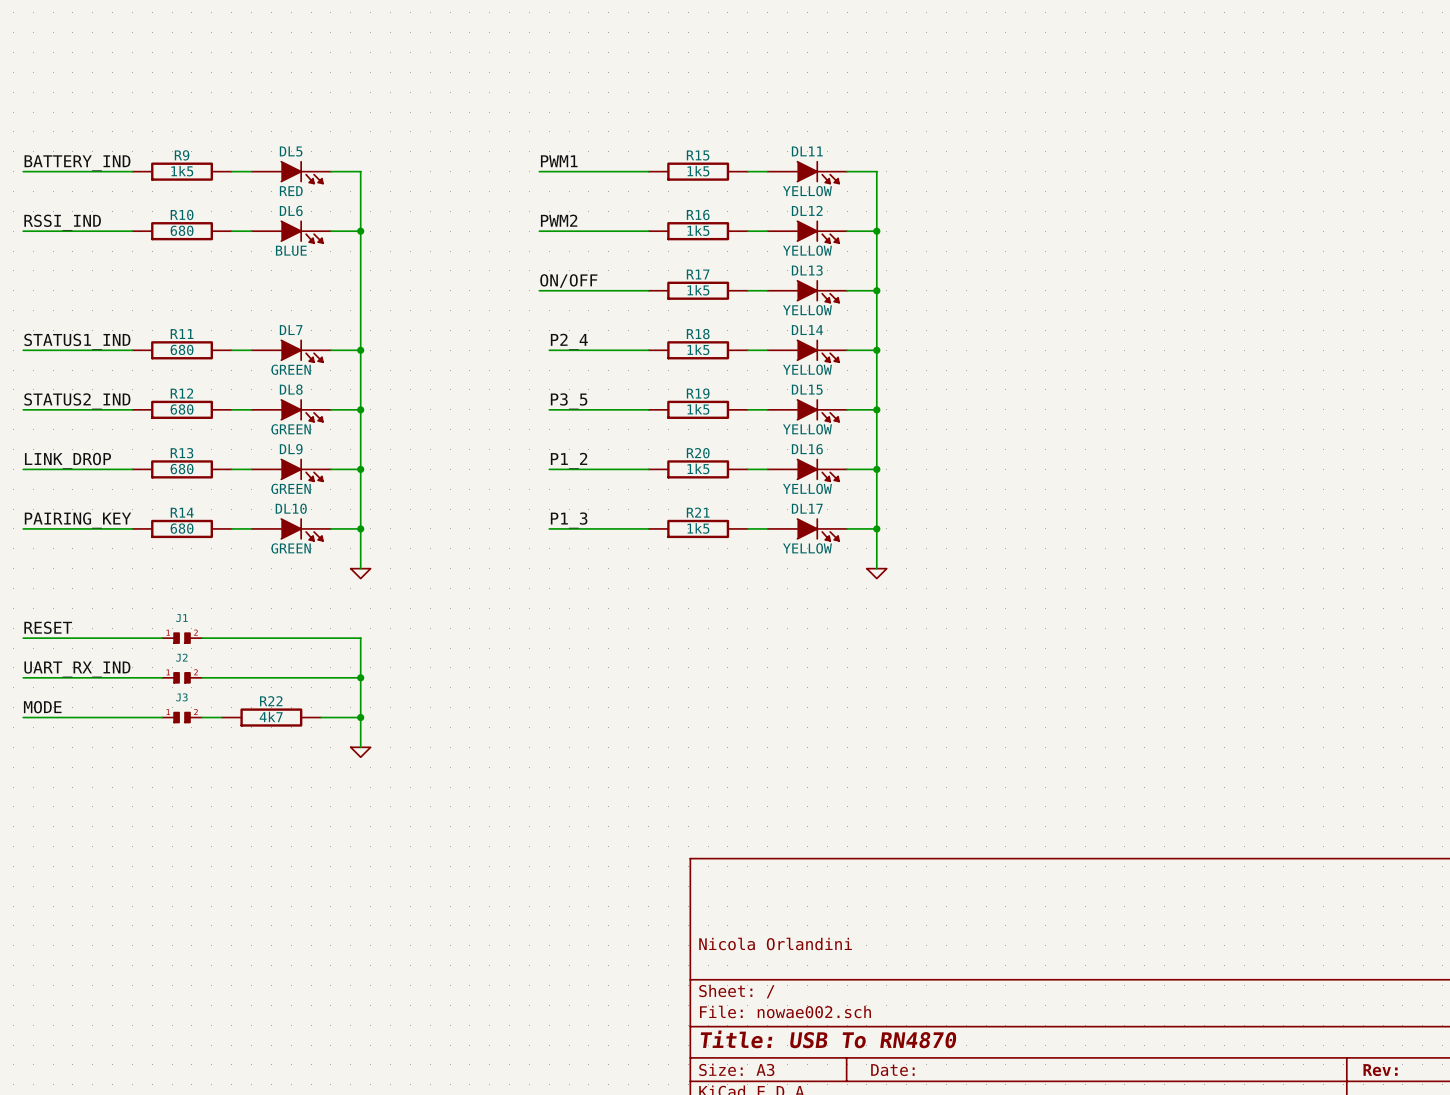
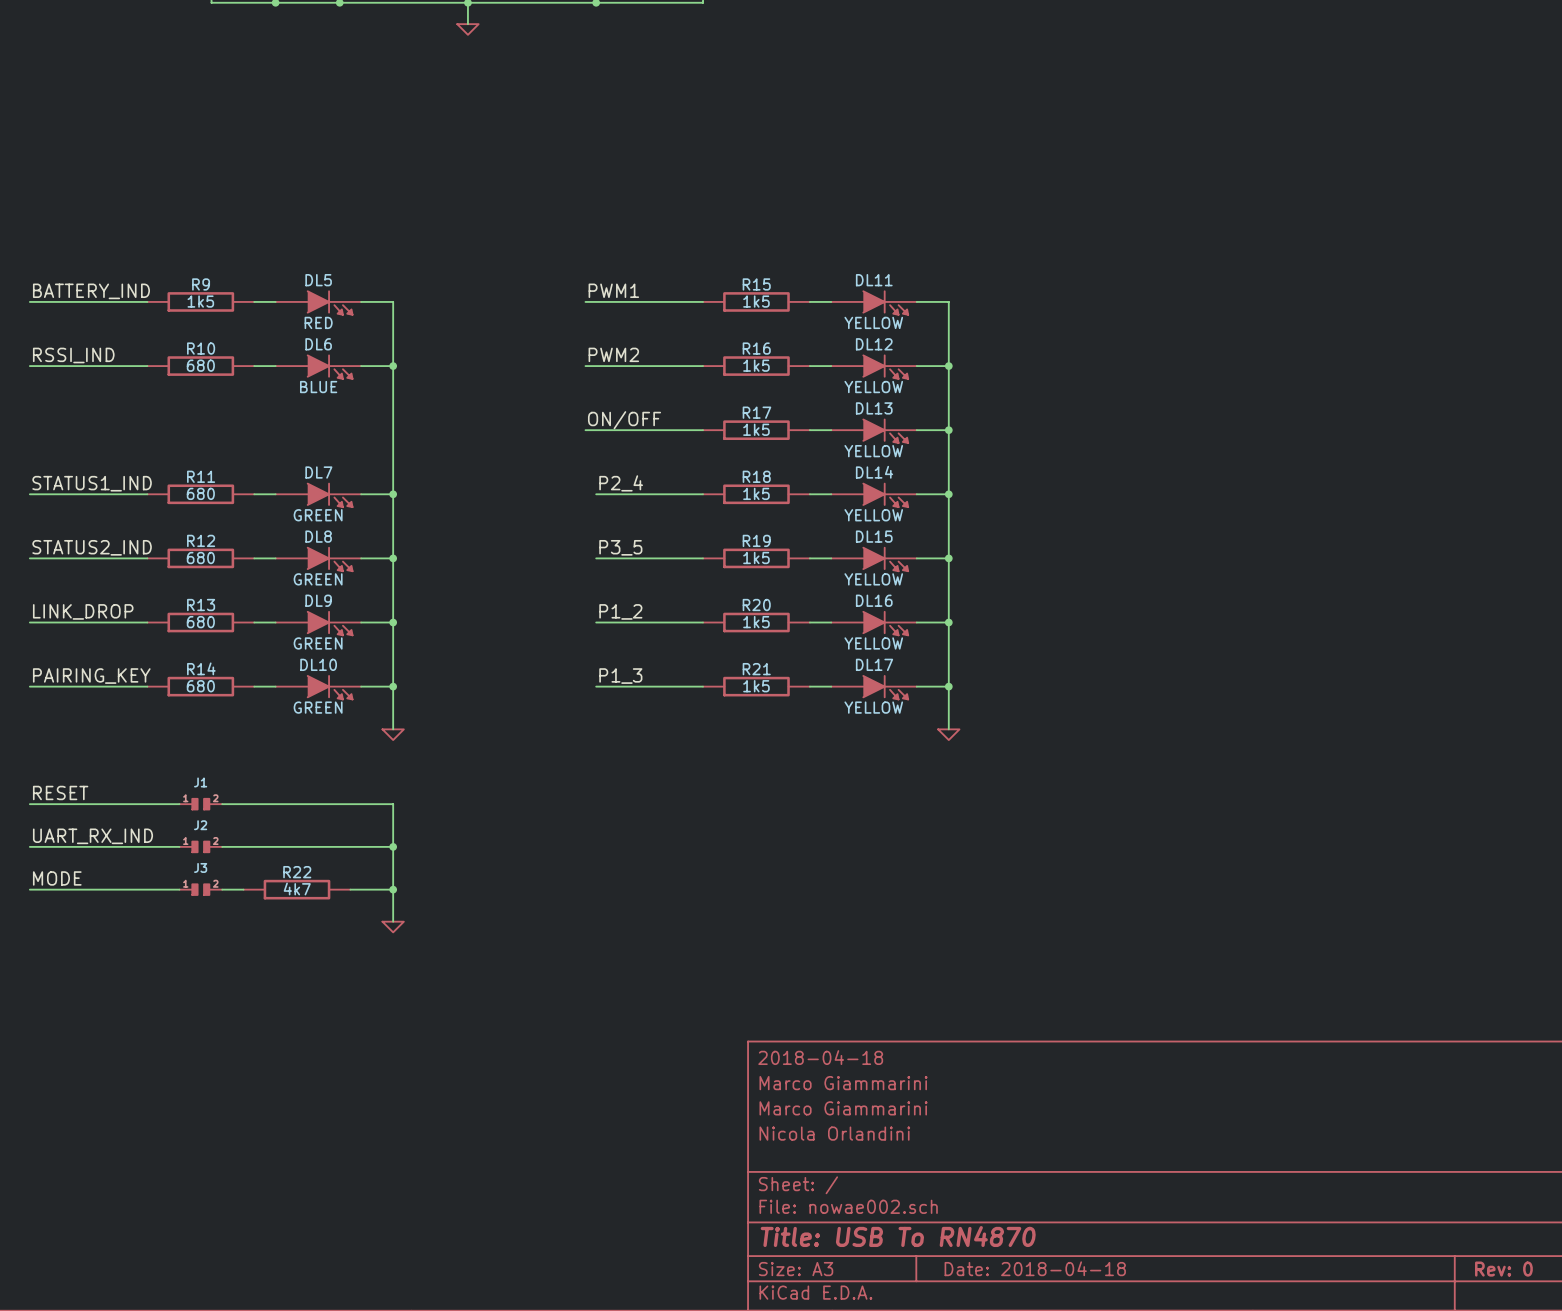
title block: none -> 2018-04-18 (820, 1057)
title block: none -> Marco Giammarini (843, 1083)
title block: none -> Marco Giammarini (843, 1108)
title block: Date: (892, 1070) -> Date: 2018-04-18 (1035, 1268)
title block: Rev: (1380, 1070) -> Rev: 0 (1503, 1269)

